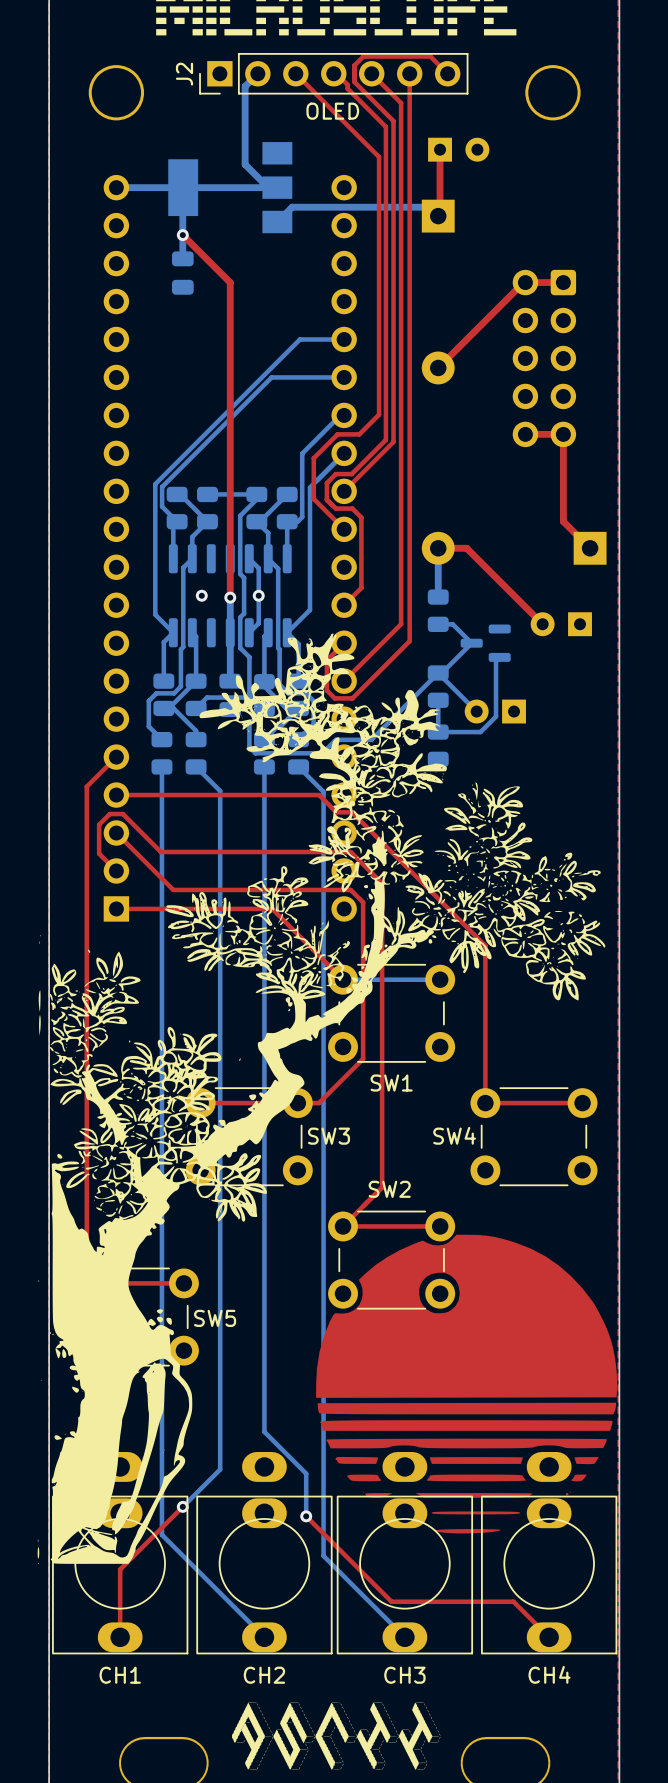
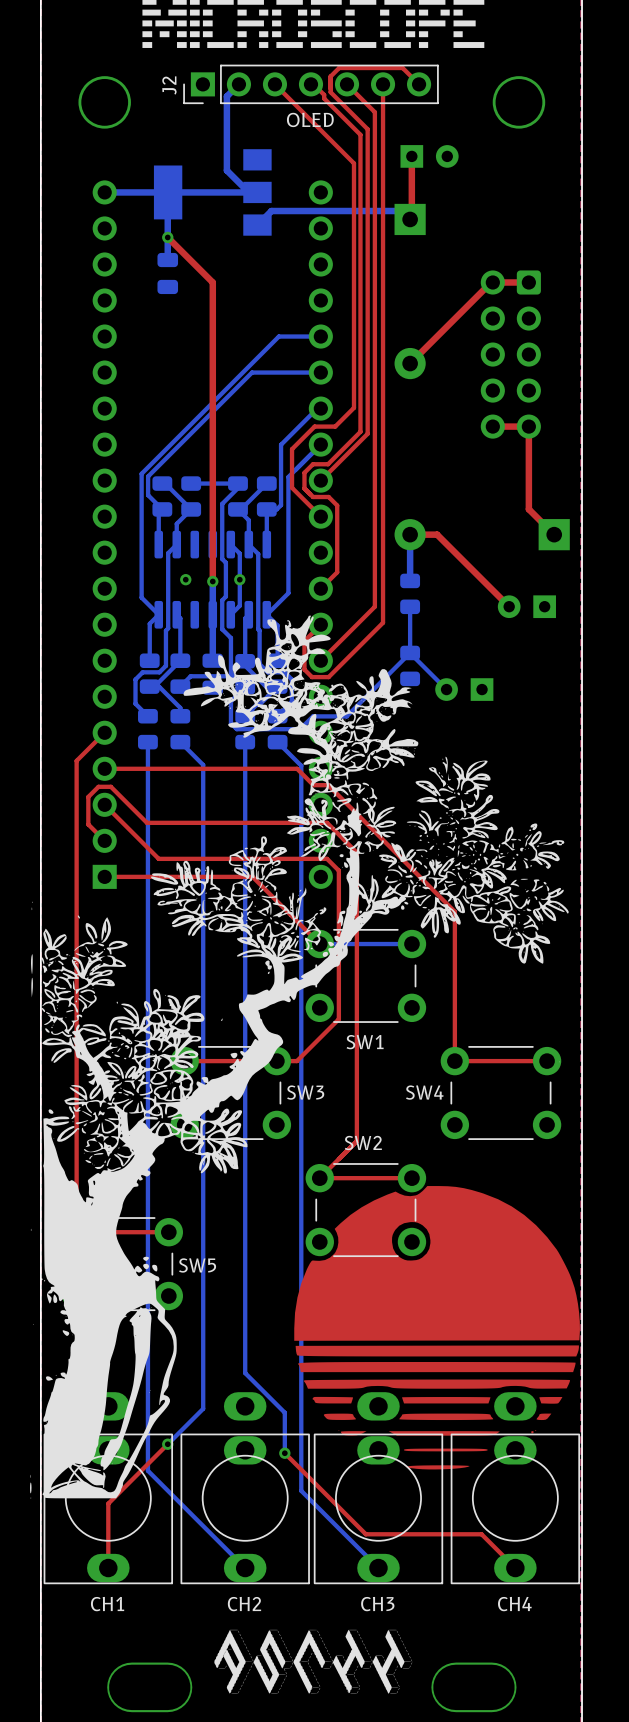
bottom track: (438, 624) (452, 624) (471, 643) (441, 672) (438, 672) -> (410, 606) (410, 652)
part: (485, 643) -> none
bottom track: (499, 657) (496, 661) (496, 716) (480, 732) (438, 732) (438, 700) -> none
part: (438, 745) -> none

